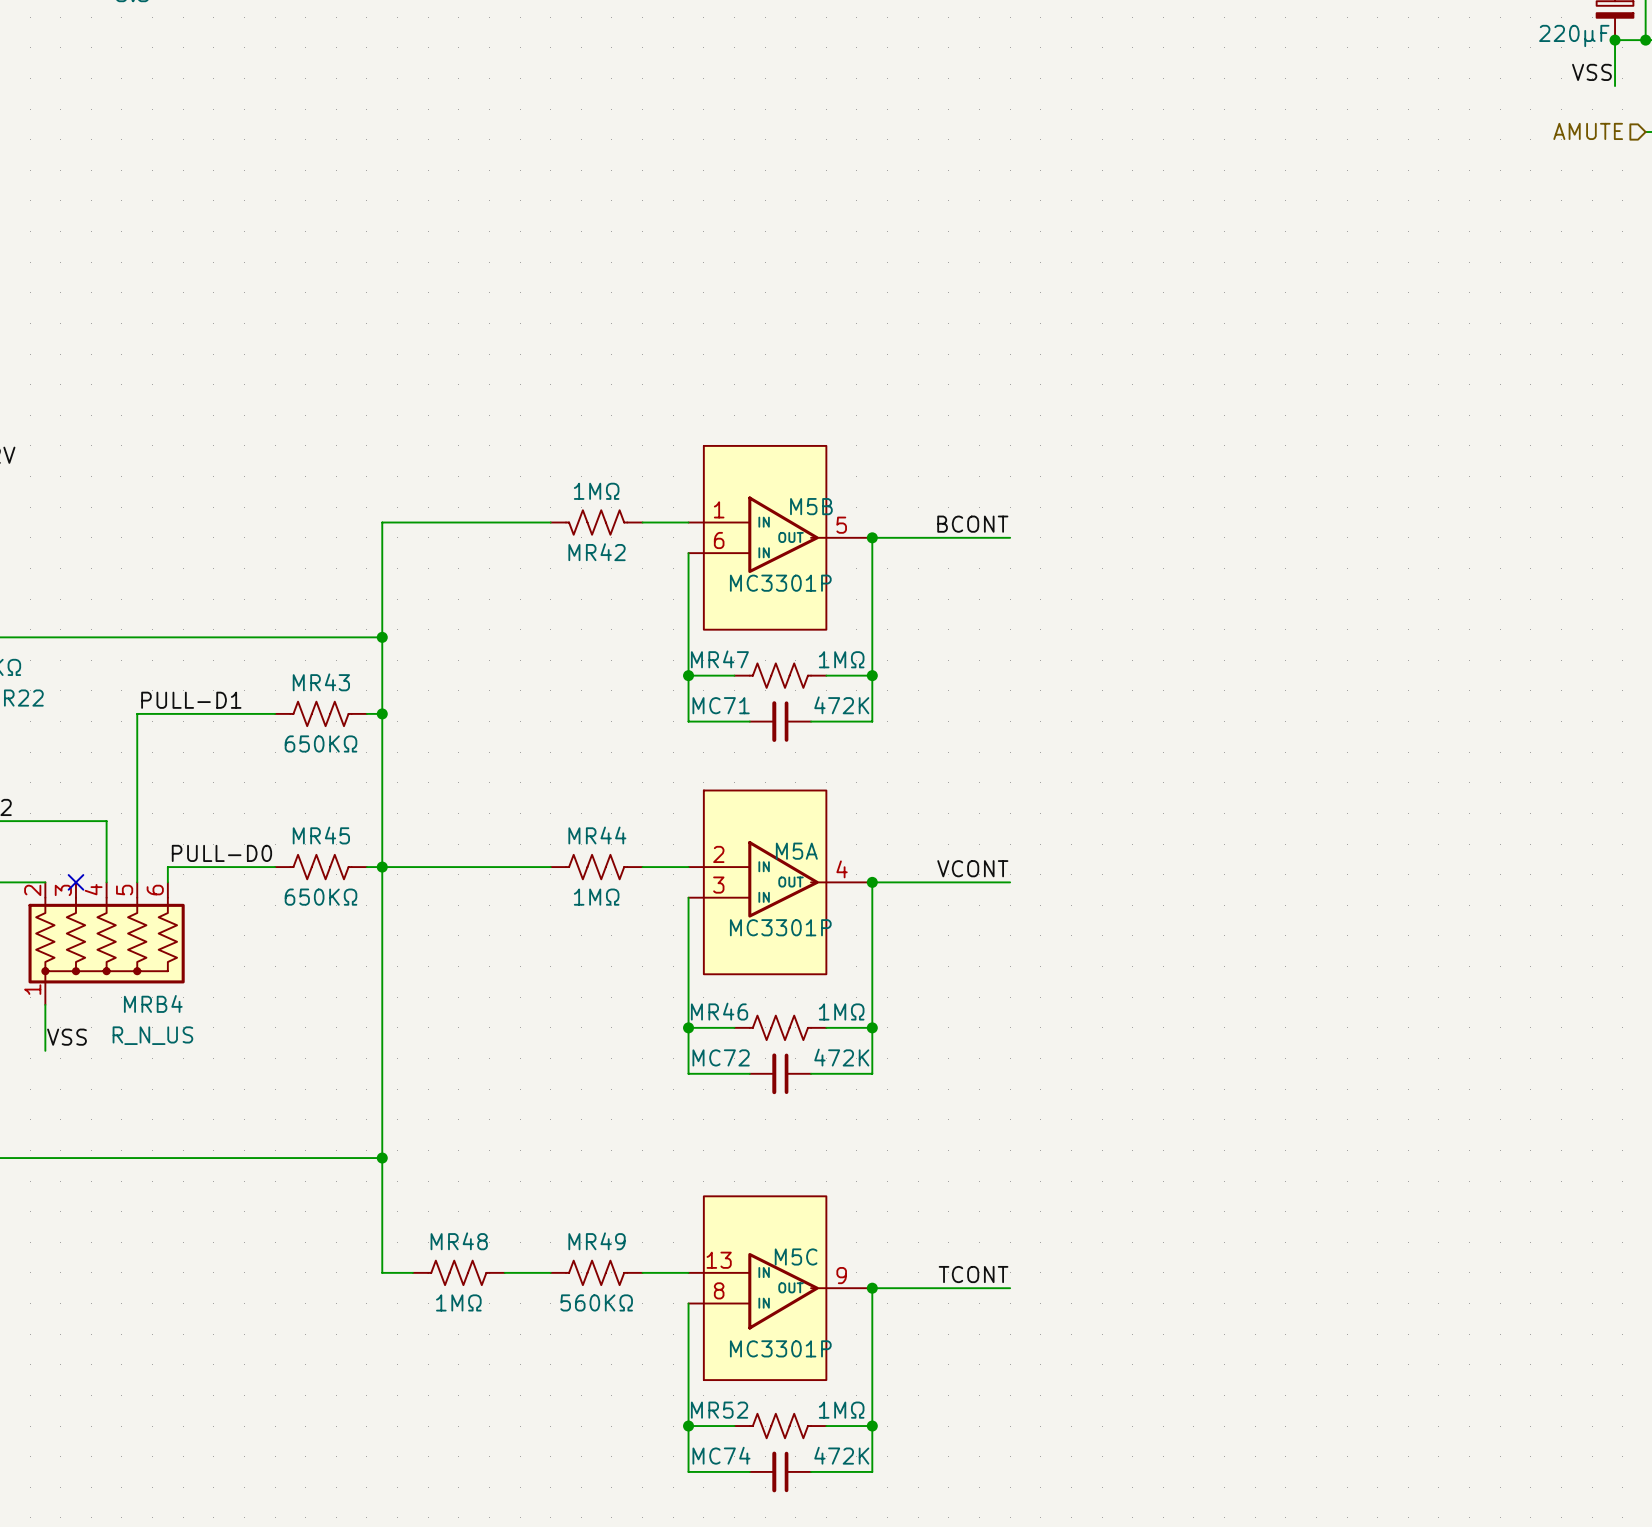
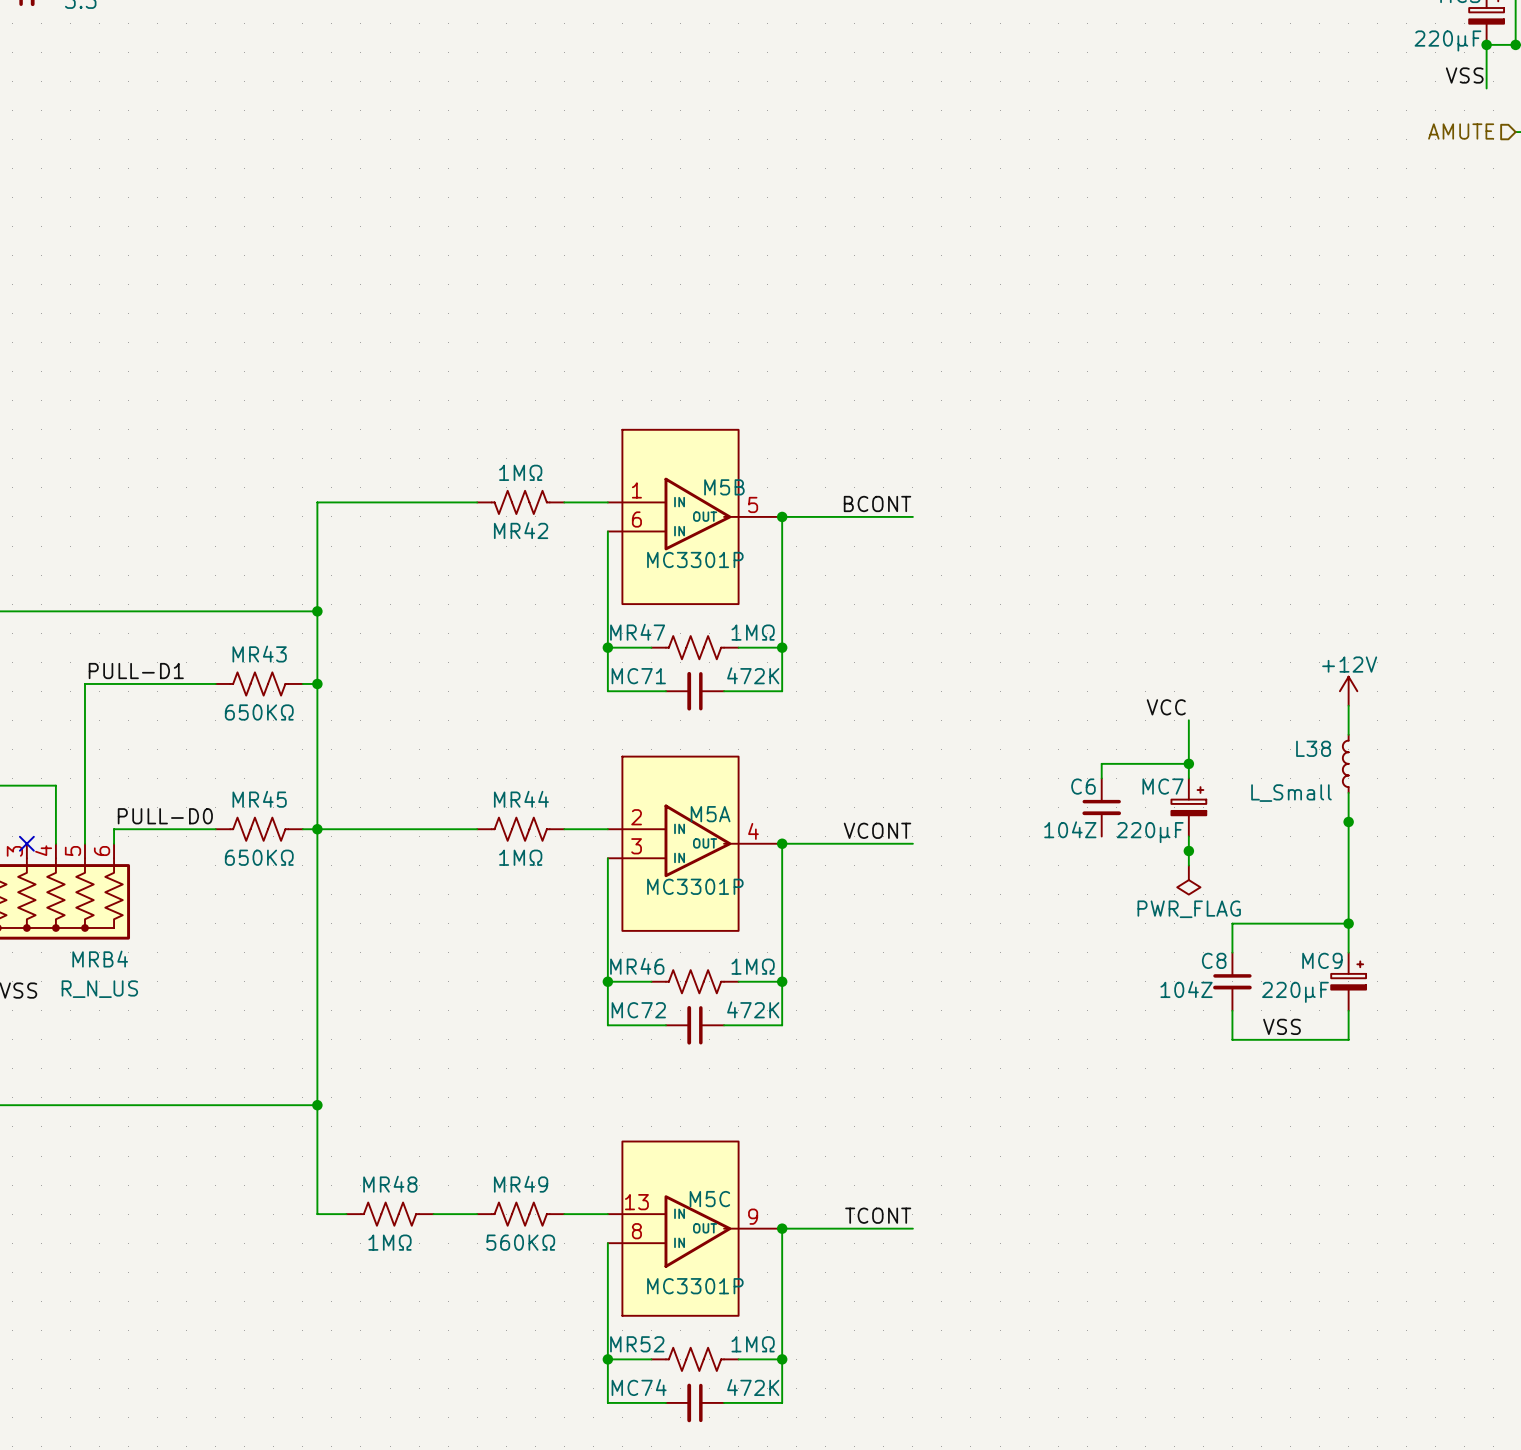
power symbol: none -> +12V (1348, 691)
wire: none -> (1348, 705) (1348, 734)
label: none -> VCC (1166, 707)
wire: none -> (1188, 720) (1188, 778)
wire: none -> (1188, 763) (1101, 763) (1101, 778)
junction: none -> (1188, 763)
L38: none -> L_Small (1345, 763)
wire: none -> (1348, 792) (1348, 952)
C6: none -> 104Z (1101, 807)
MC7: none -> 220µF (1188, 807)
junction: none -> (1348, 821)
wire: none -> (1188, 836) (1188, 865)
junction: none -> (1188, 851)
power symbol: none -> PWR_FLAG (1188, 880)
wire: none -> (1348, 923) (1232, 923) (1232, 952)
junction: none -> (1348, 923)
C8: none -> 104Z (1232, 981)
MC9: none -> 220µF (1348, 981)
wire: none -> (1232, 1010) (1232, 1039) (1348, 1039) (1348, 1010)
label: none -> VSS (1281, 1026)

